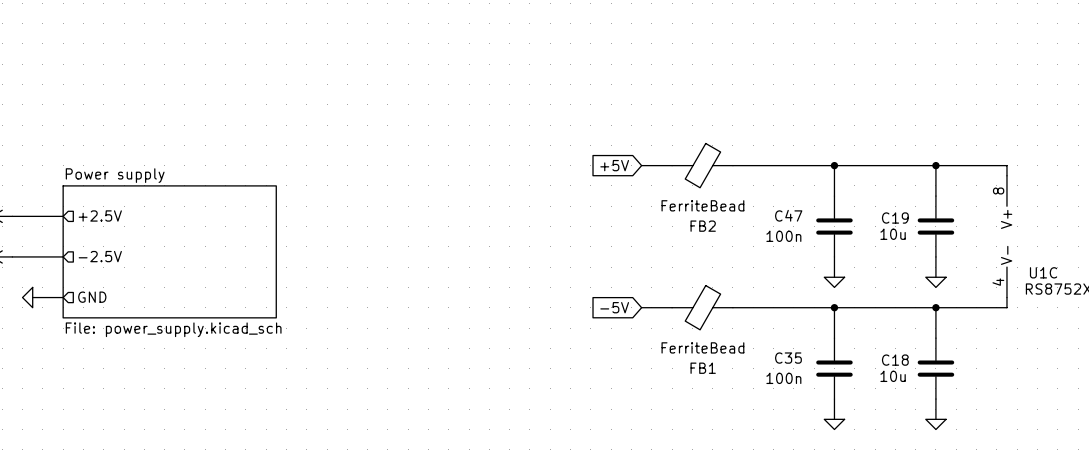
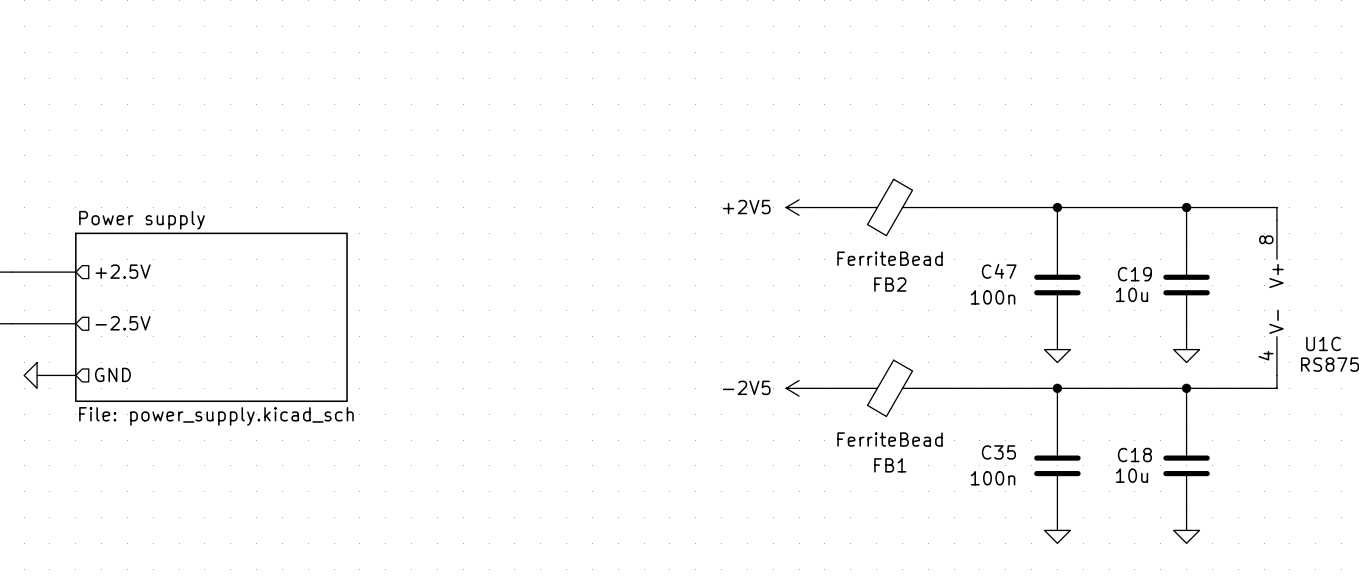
global label: +5V (614, 165) -> none
power symbol: none -> +2V5 (799, 207)
global label: -5V (614, 307) -> none
power symbol: none -> -2V5 (799, 388)

